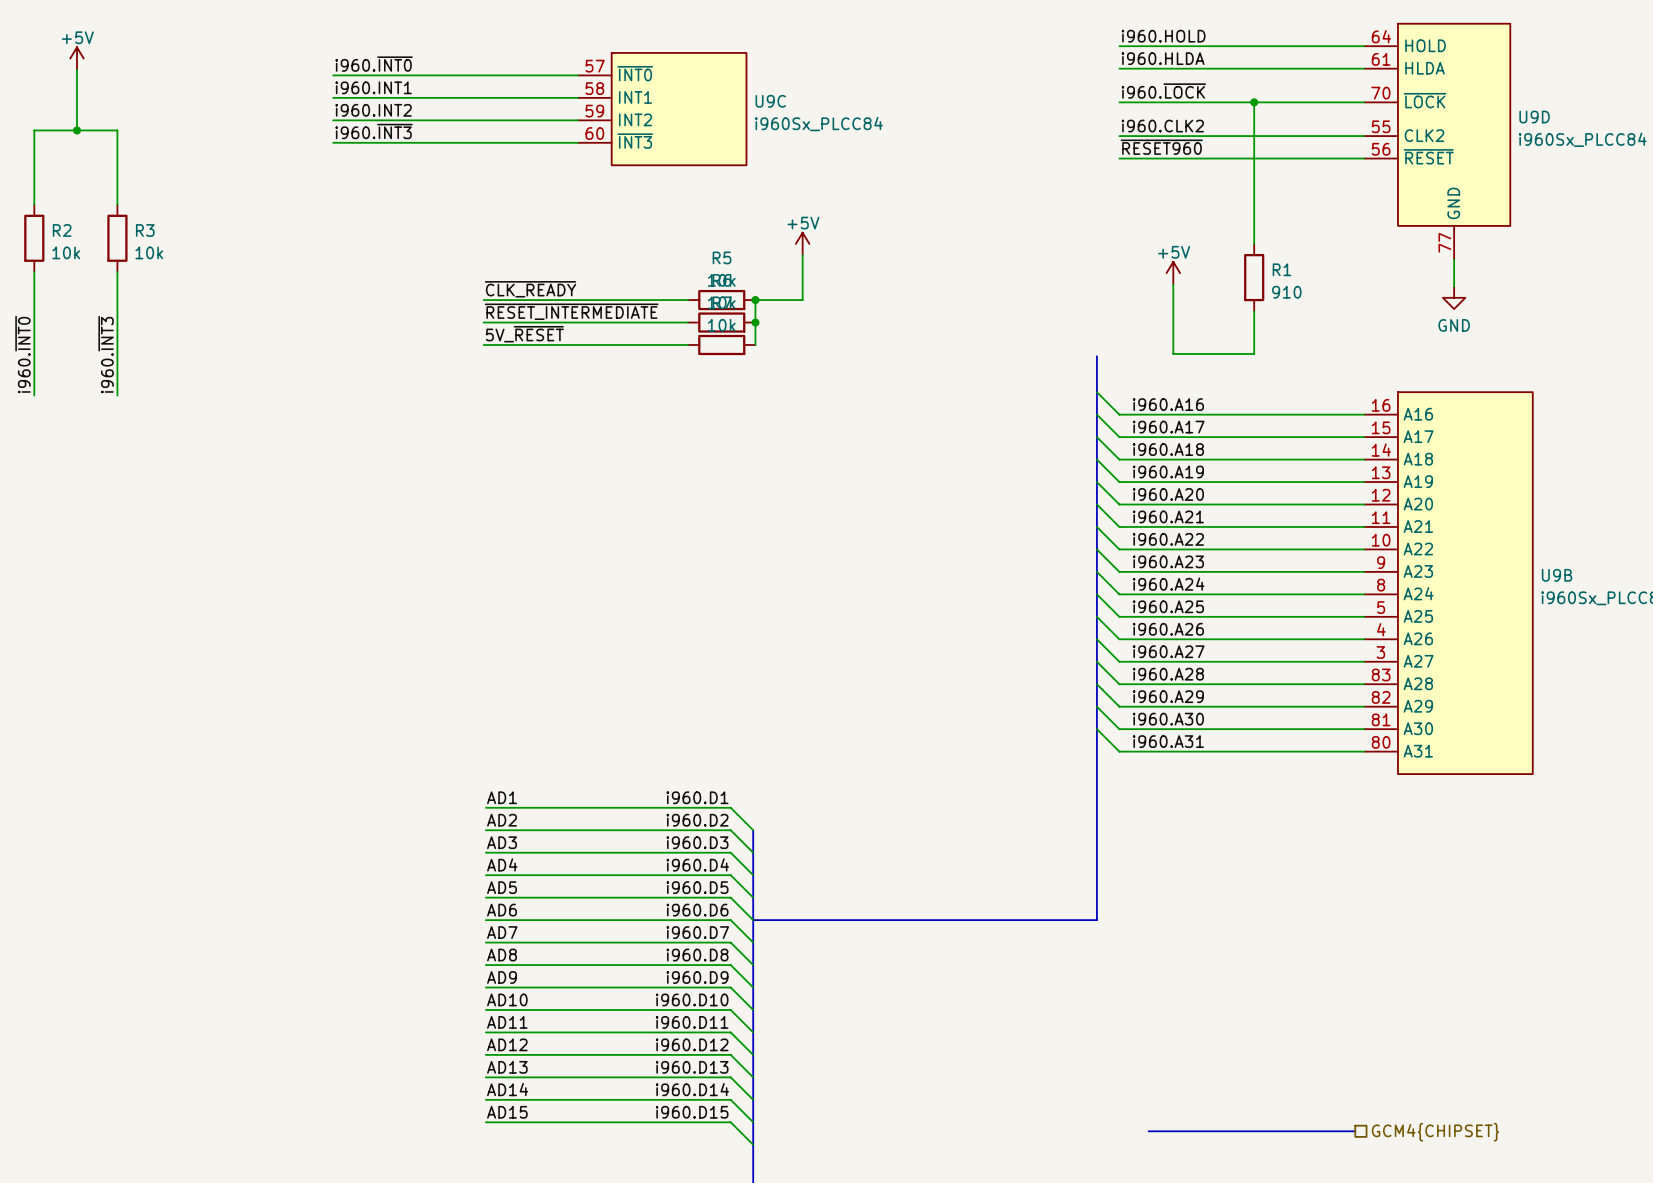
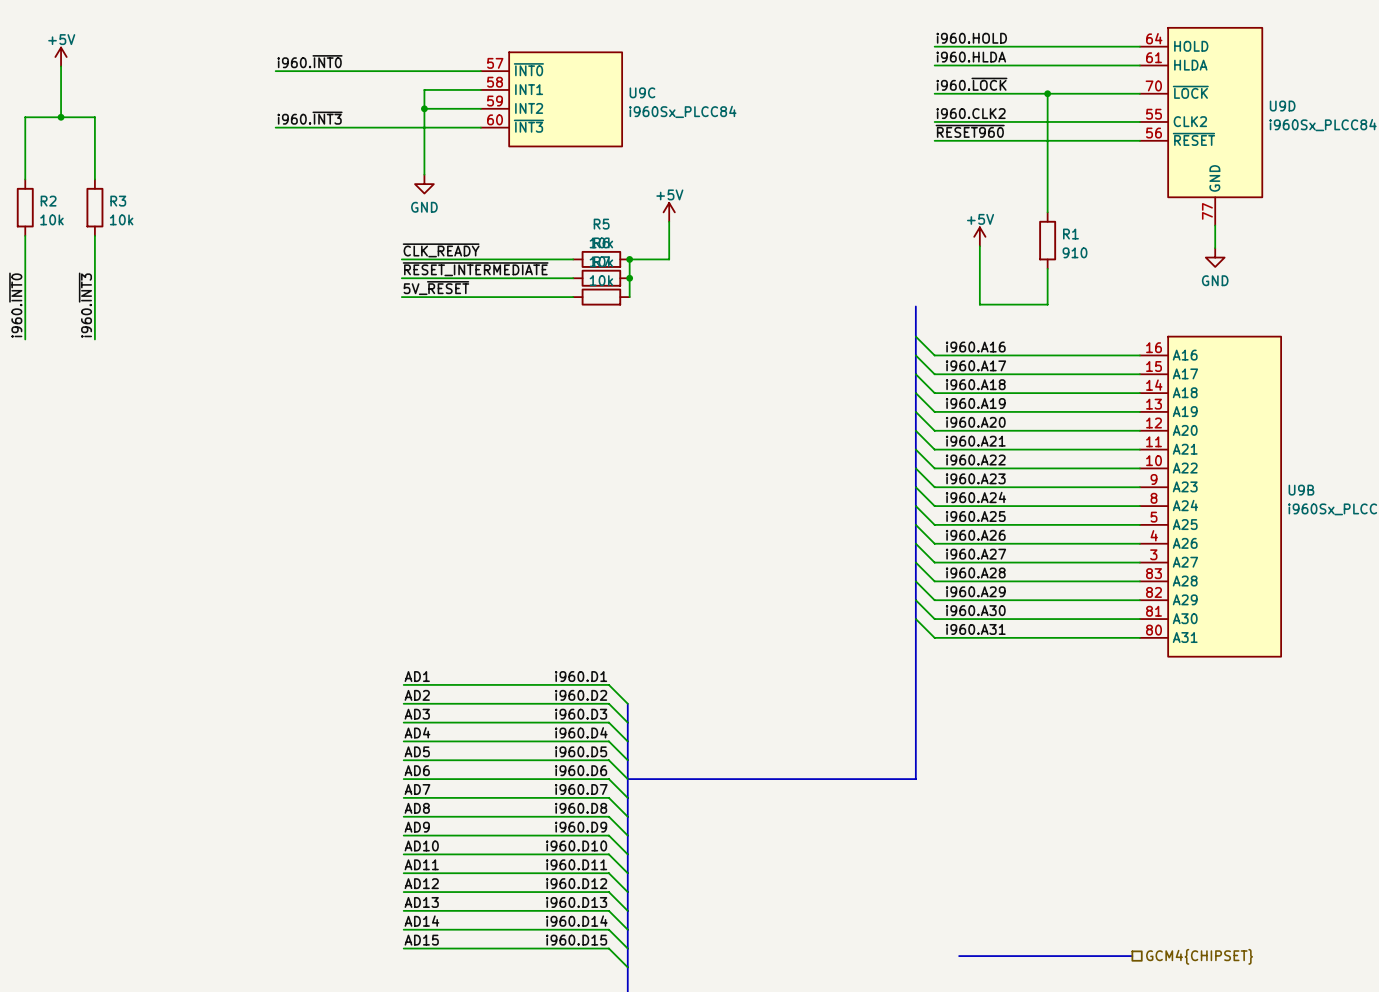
label: i960.INT1 (373, 87) -> none
wire: (333, 97) (510, 97) -> (424, 174) (424, 89)
label: i960.INT2 (373, 110) -> none
wire: (333, 120) (510, 120) -> none
junction: none -> (424, 108)
power symbol: none -> GND (424, 184)

